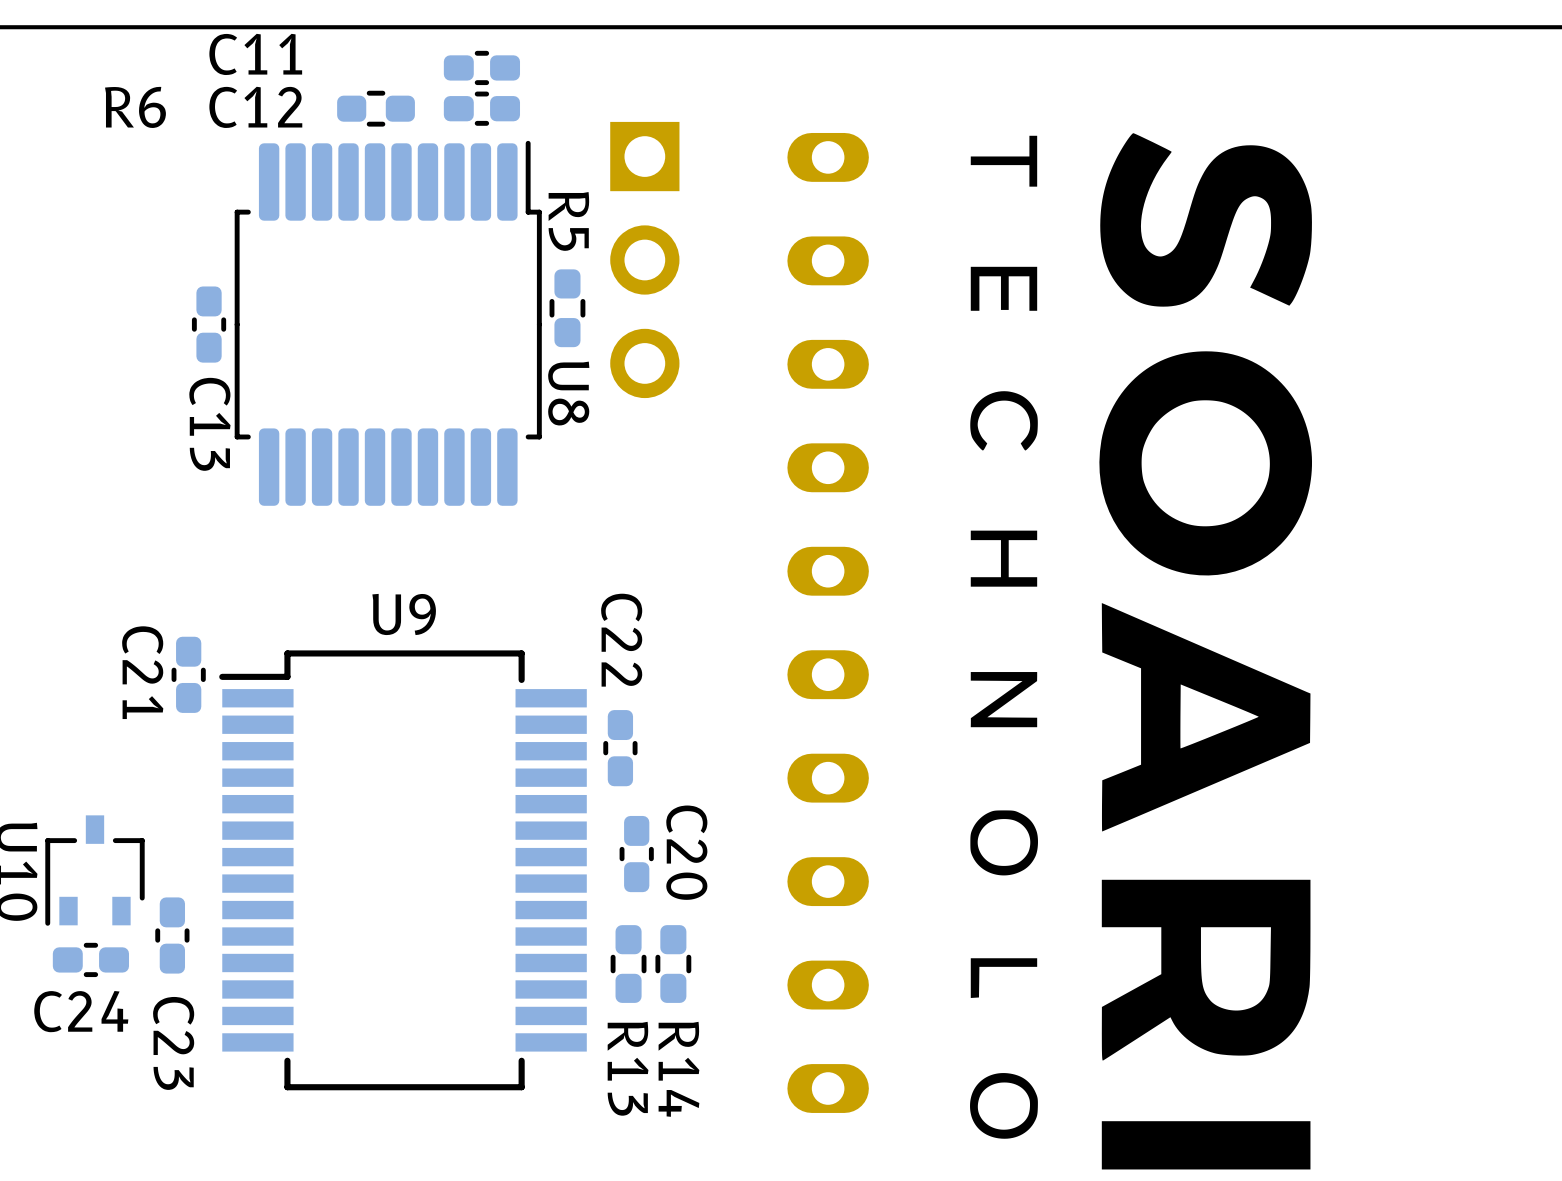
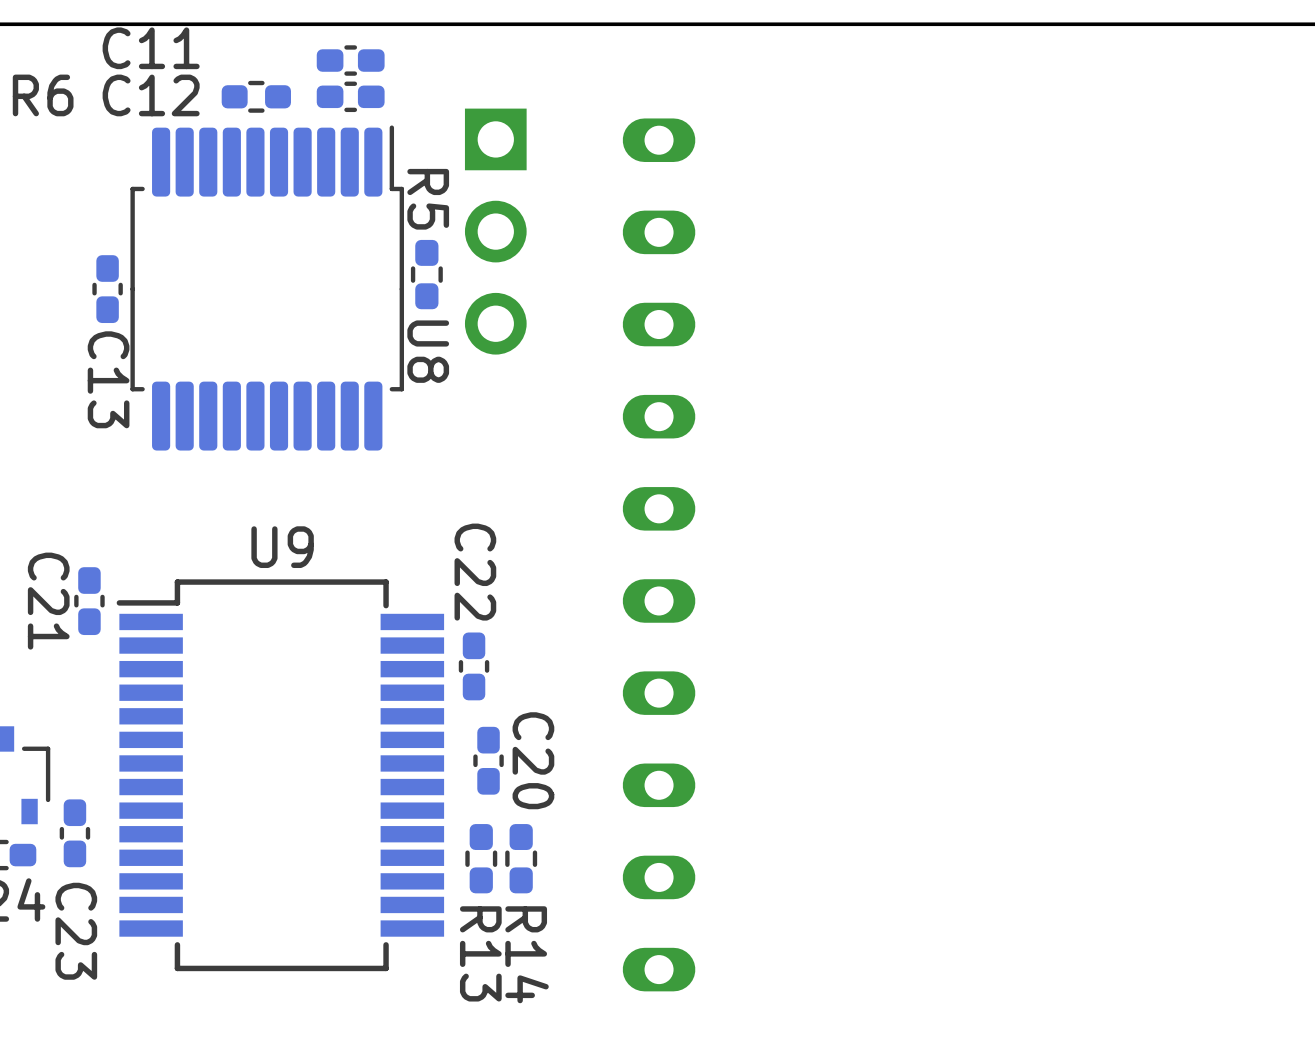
drawing: [1099, 133, 1313, 1061] -> none
drawing: [970, 135, 1038, 187] -> none
drawing: [970, 266, 1038, 311] -> none
drawing: [970, 391, 1038, 451] -> none
drawing: [970, 530, 1038, 587] -> none
drawing: [970, 672, 1038, 728] -> none
drawing: [970, 810, 1038, 876] -> none
drawing: [970, 958, 1038, 998] -> none
drawing: [970, 1073, 1038, 1139] -> none
drawing: [1101, 1121, 1311, 1170] -> none

